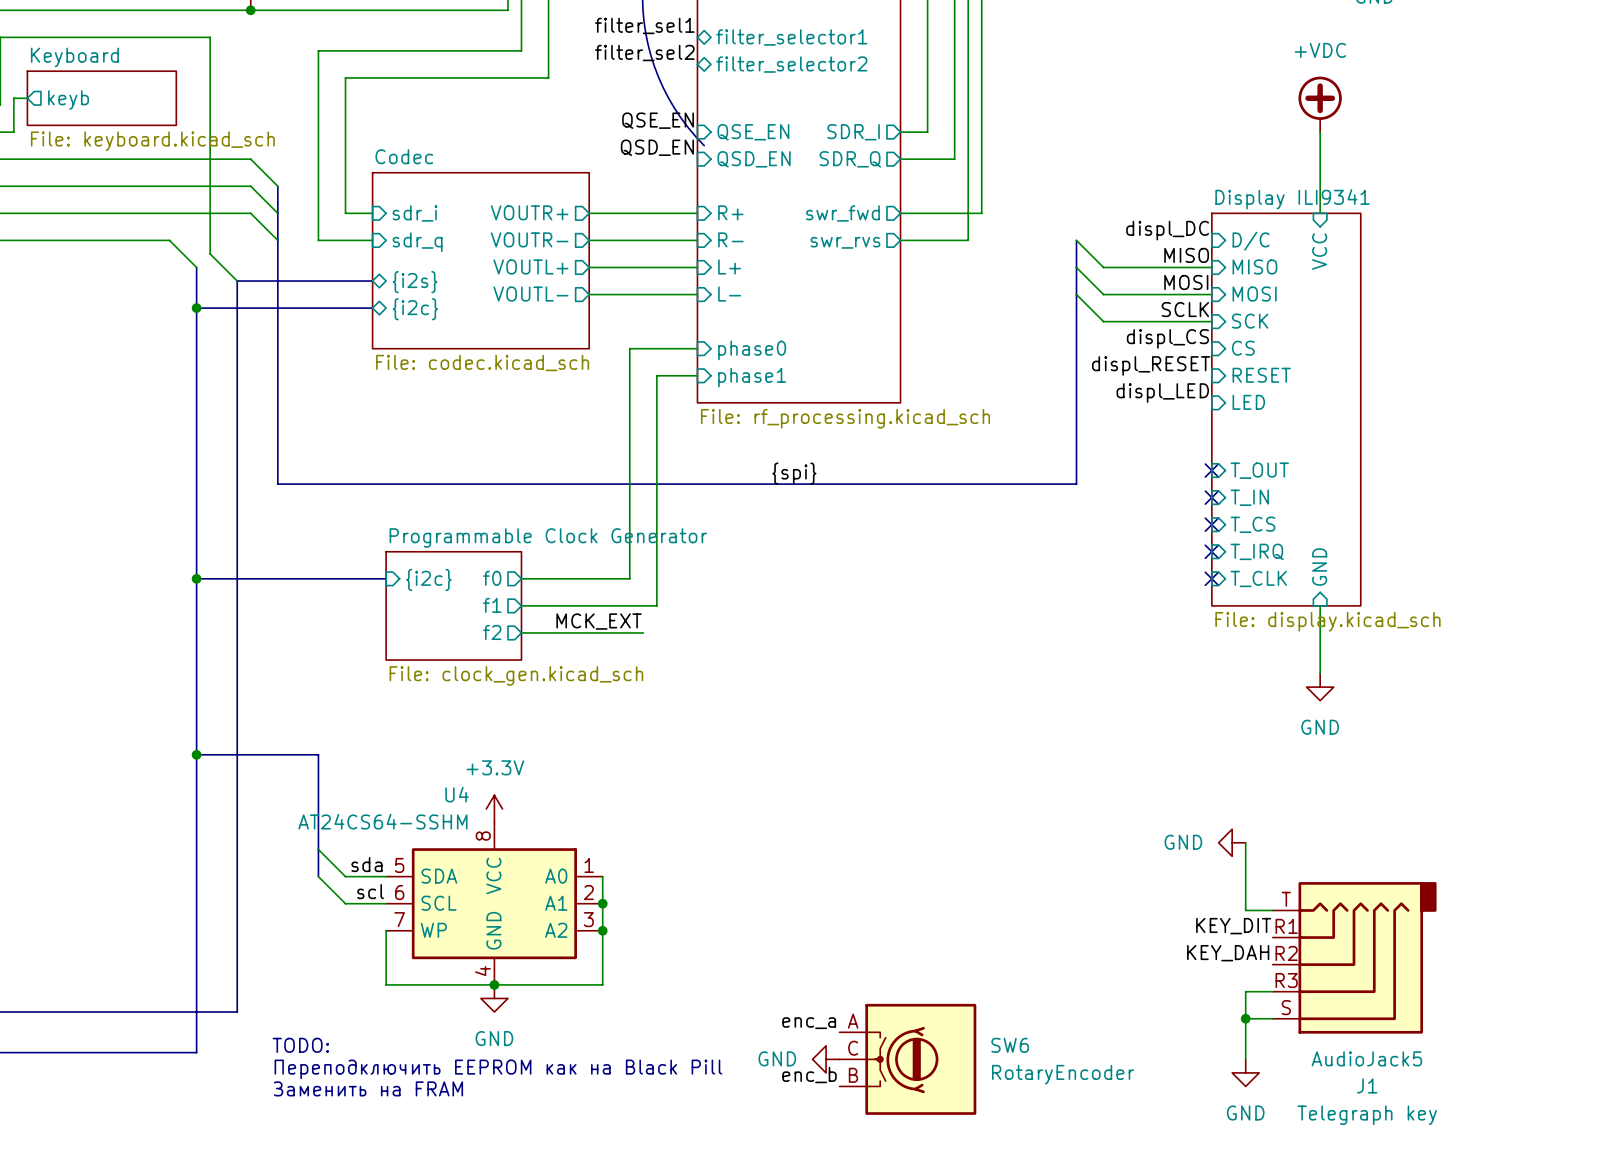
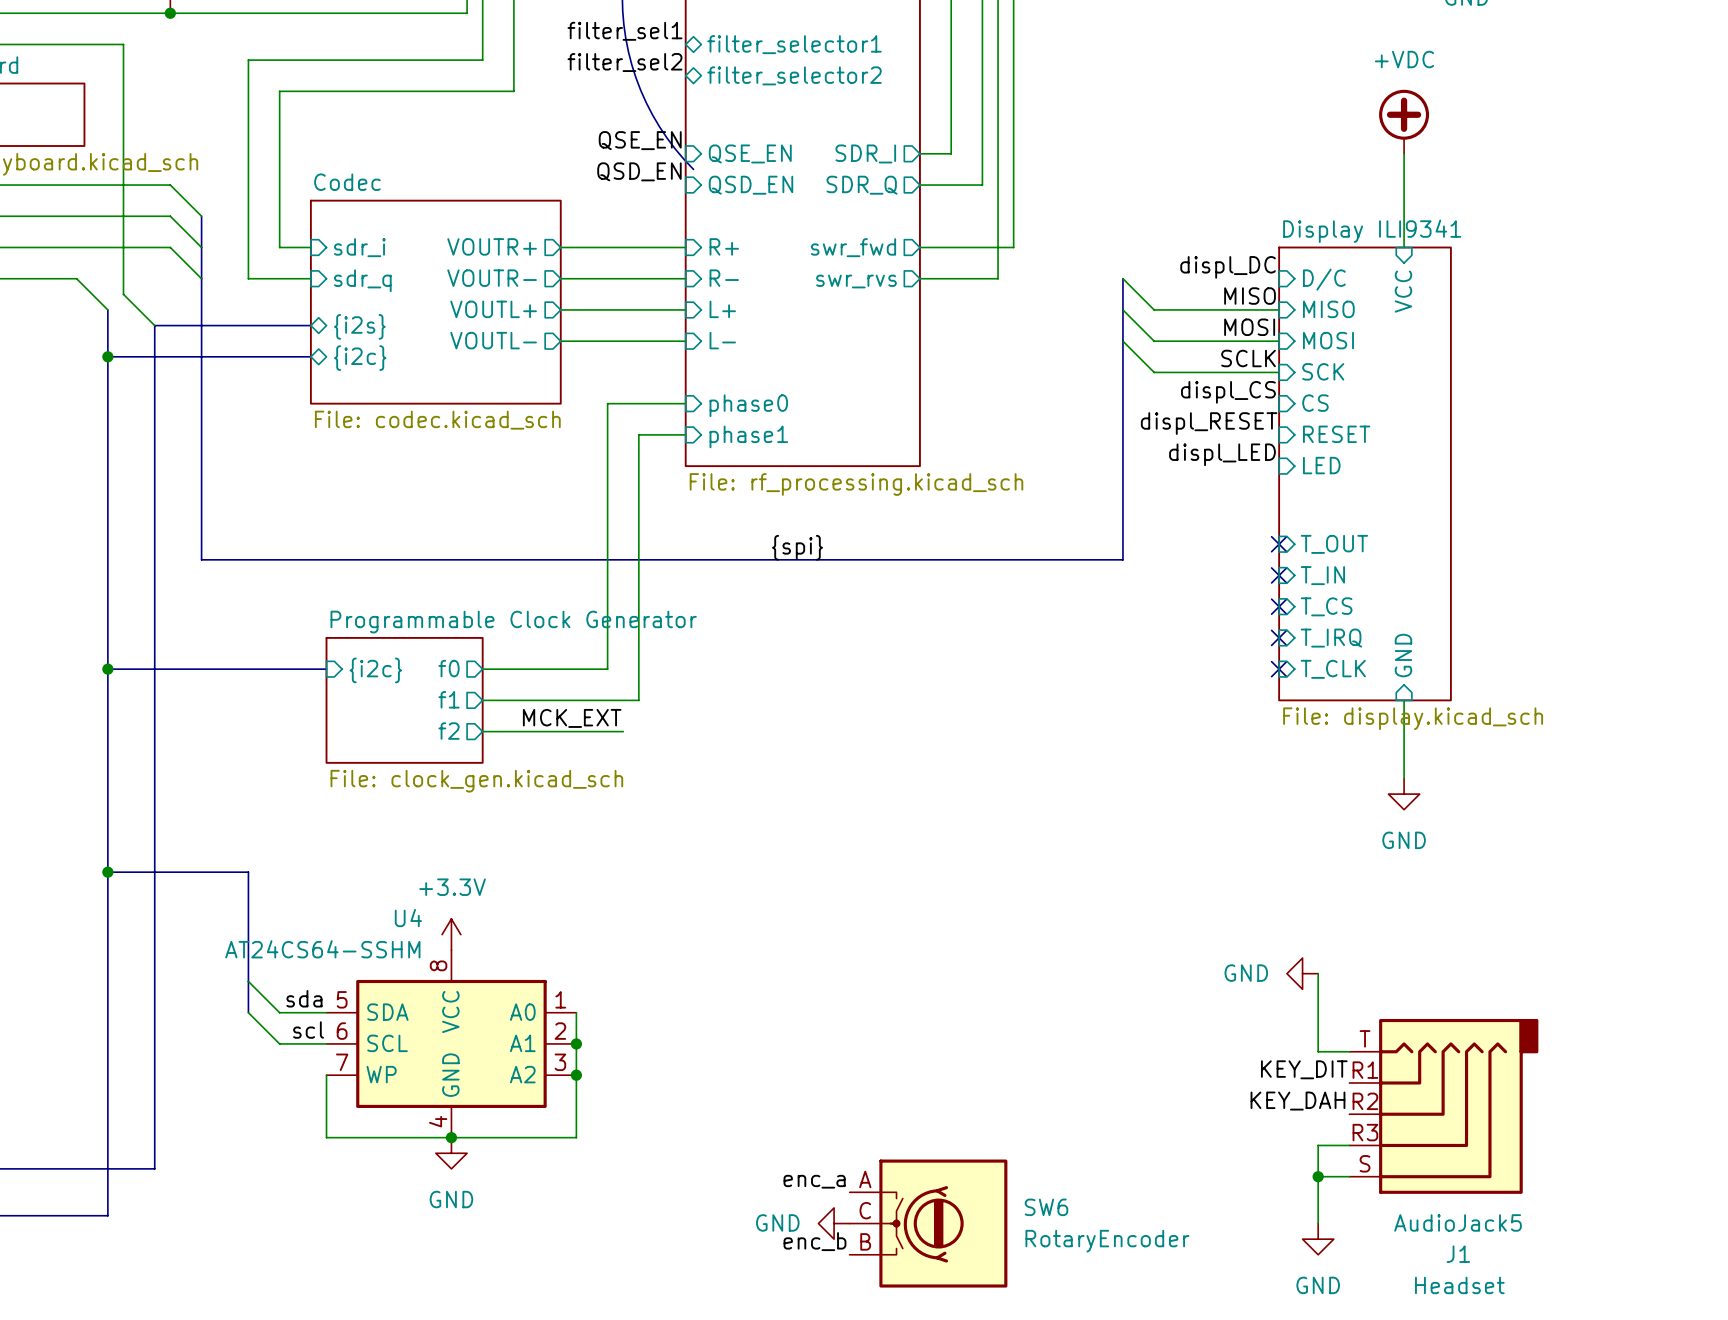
text: TODO: (300, 1045) -> none
text: Переподключить EEPROM как на Black Pill (498, 1069) -> none
text: Заменить на FRAM (368, 1088) -> none
J1 text: Telegraph key (1367, 1115) -> Headset (1459, 1285)

